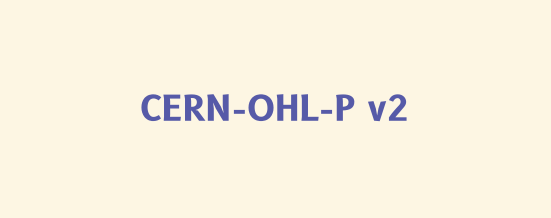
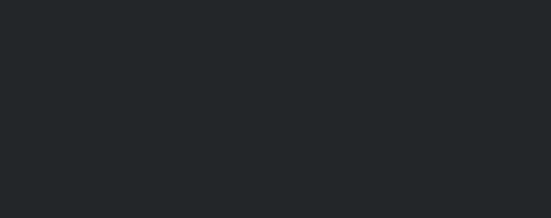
text: CERN-OHL-P v2 (274, 107) -> none

